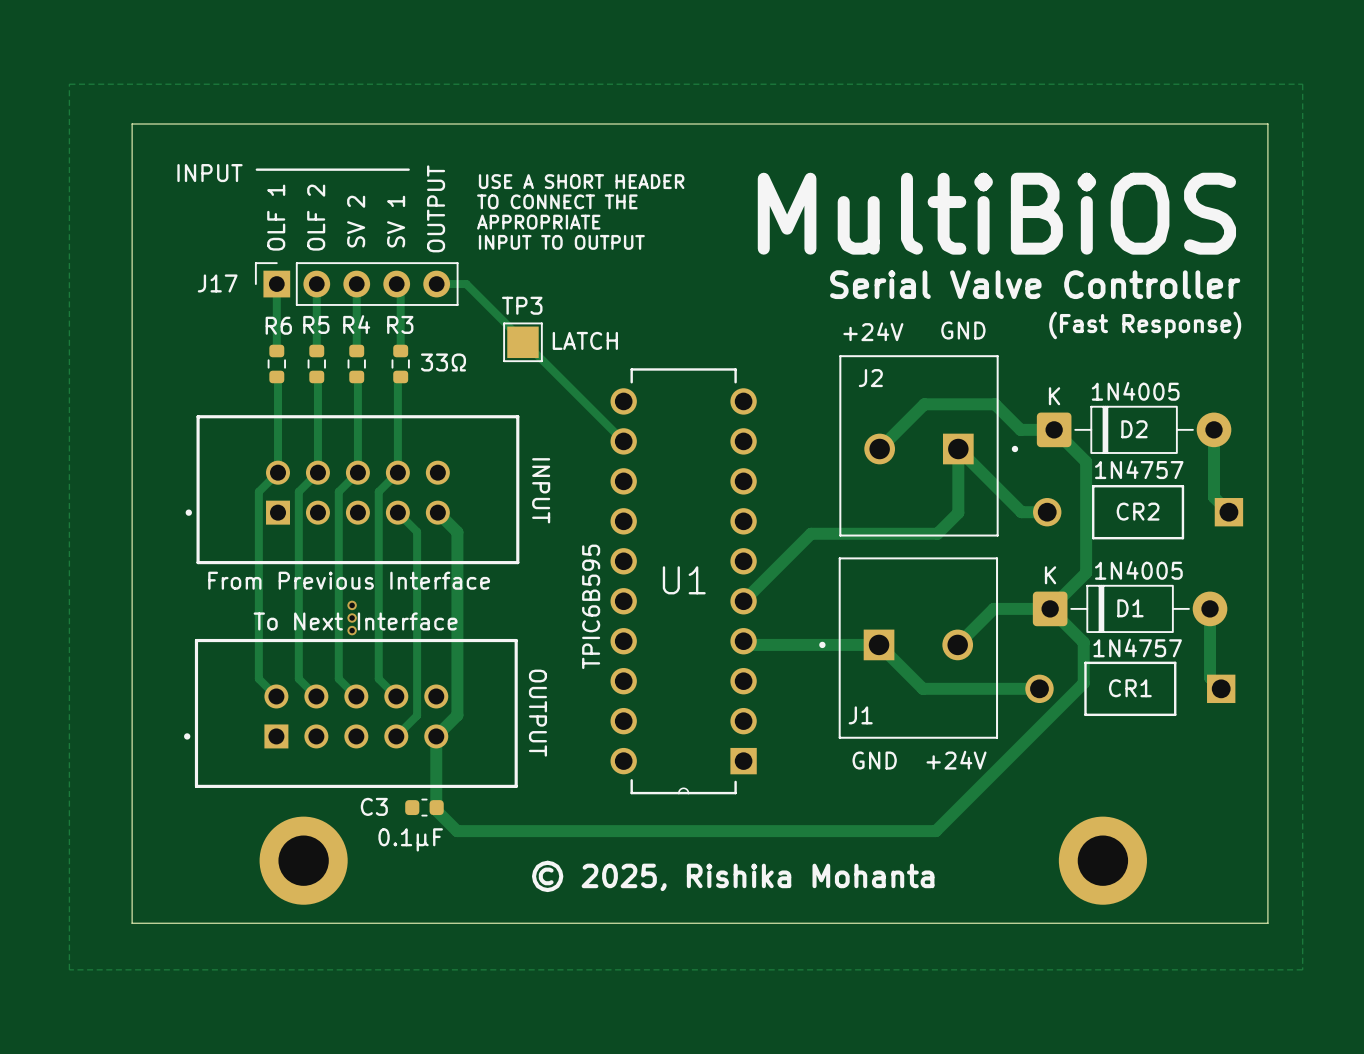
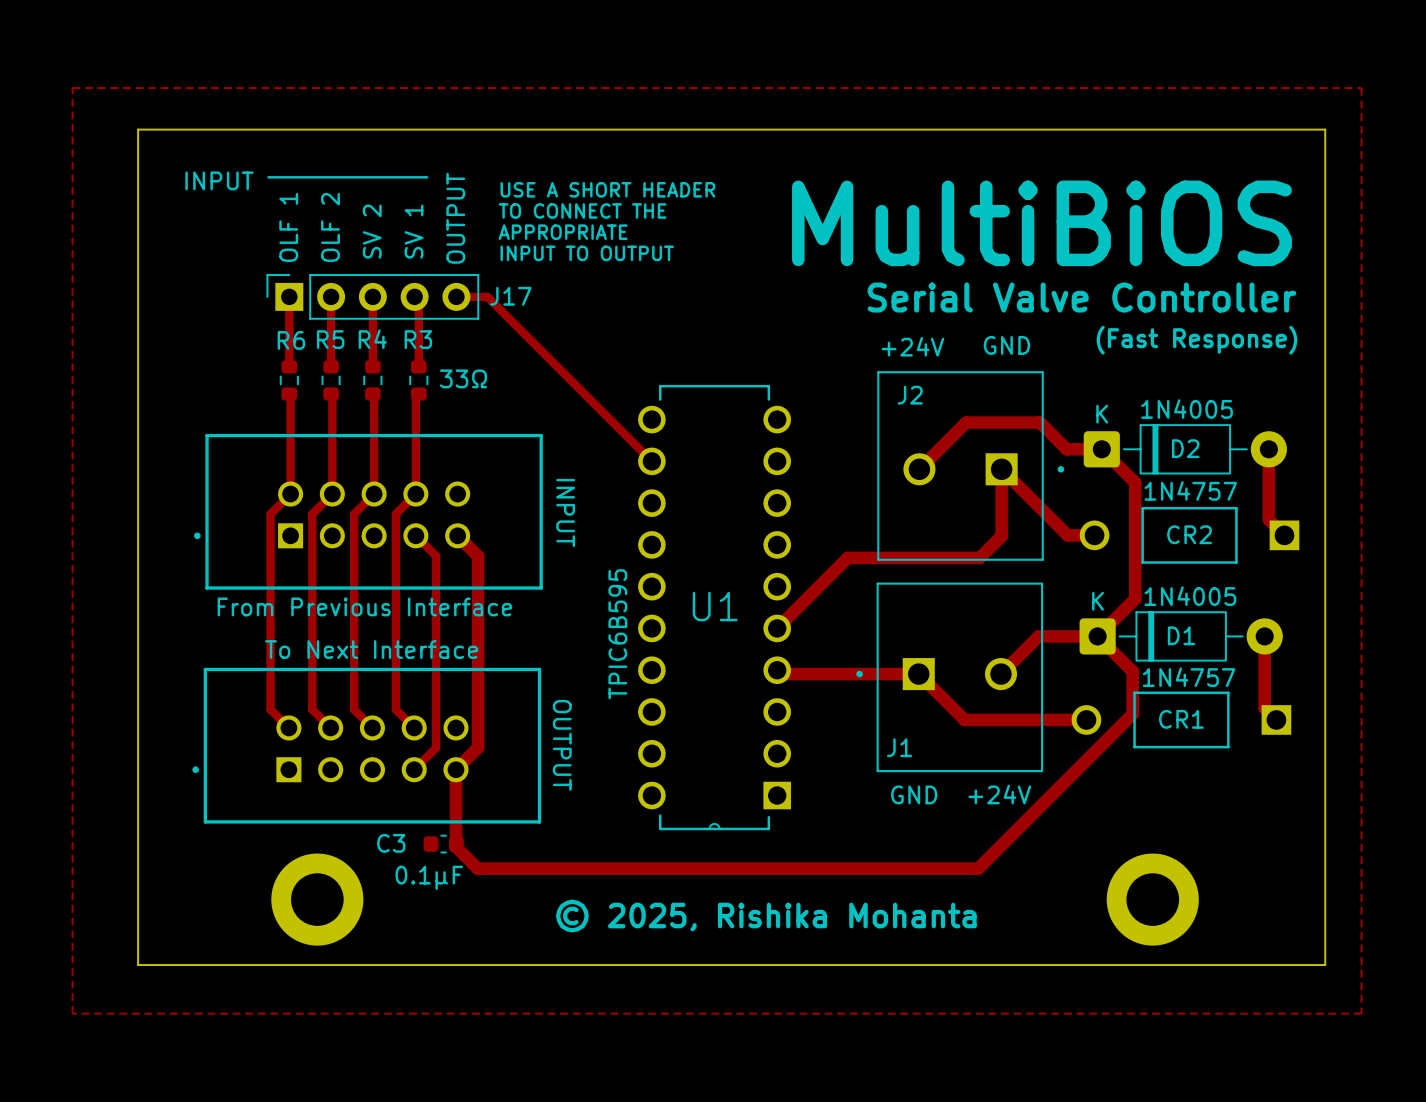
J17 name position: J17 (217, 283) -> J17 (510, 296)
text: LATCH (585, 340) -> none
TP3: (522, 342) -> none
via: (352, 605) -> none
via: (352, 617) -> none
via: (352, 630) -> none

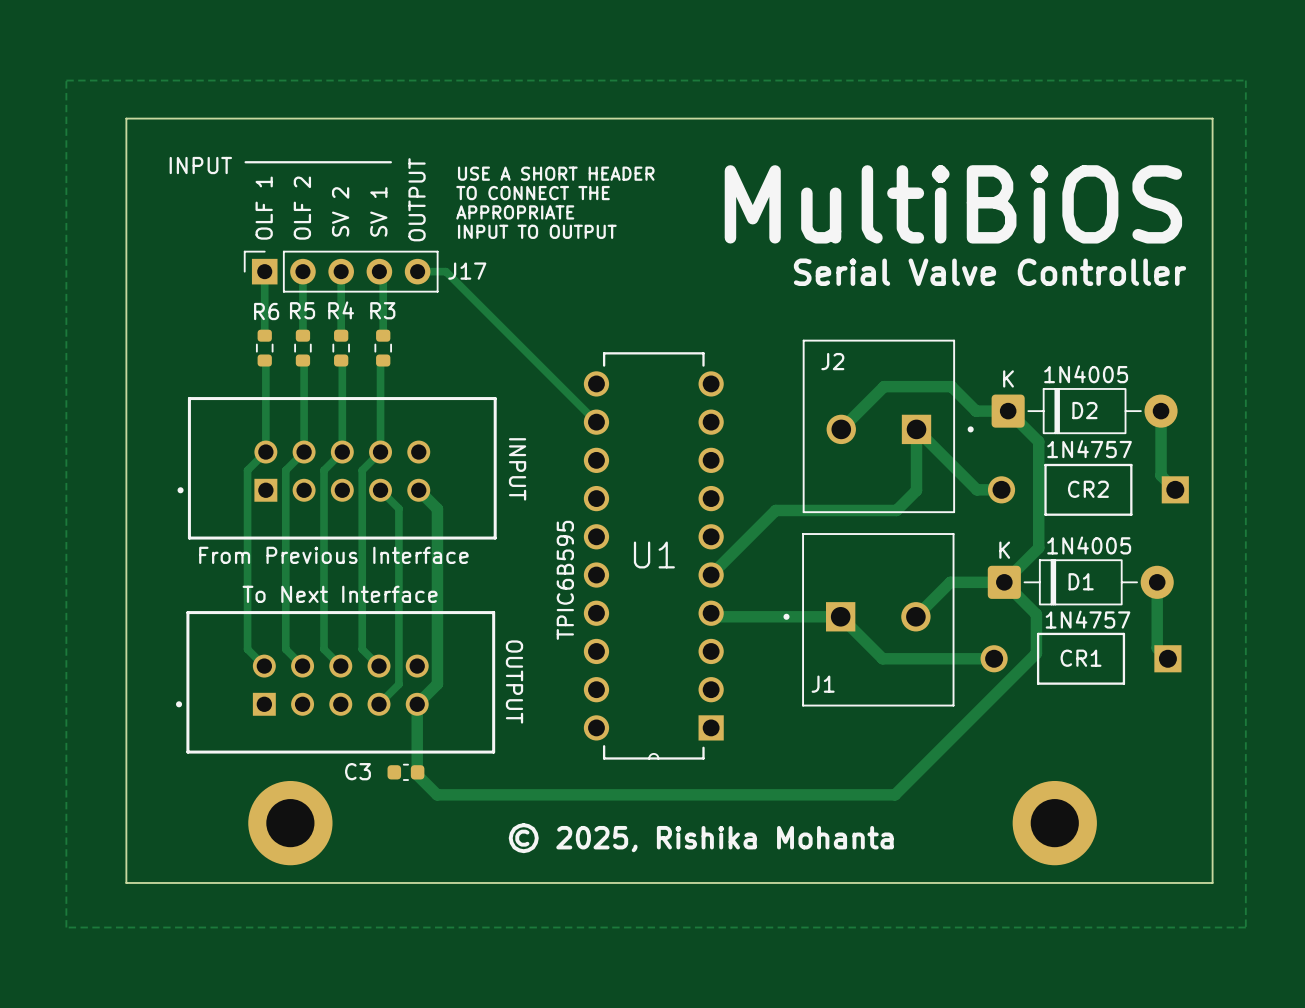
text: (Fast Response) (1196, 340) -> none
text: GND (1006, 345) -> none
text: +24V (912, 346) -> none
text: 33Ω (463, 378) -> none
text: GND (914, 794) -> none
text: +24V (999, 794) -> none
text: 0.1μF (429, 877) -> none

